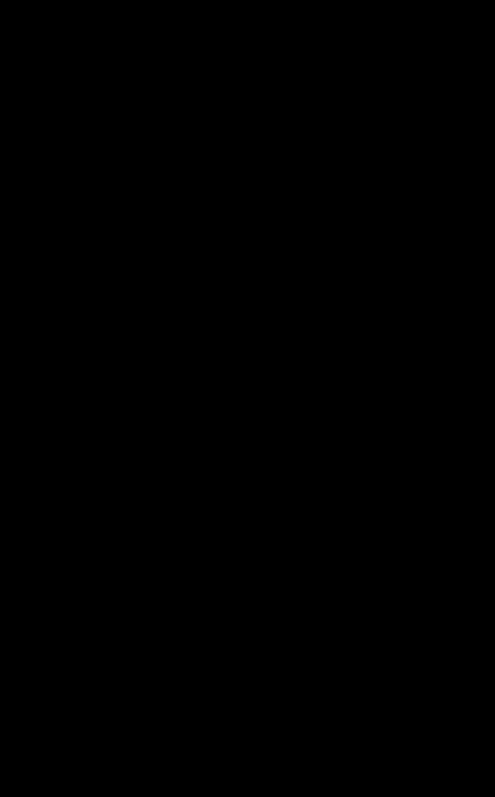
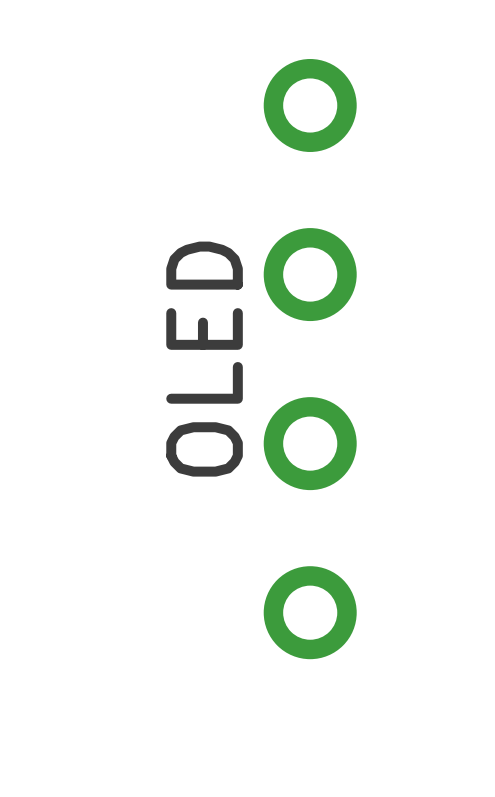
part: none -> (310, 359)

